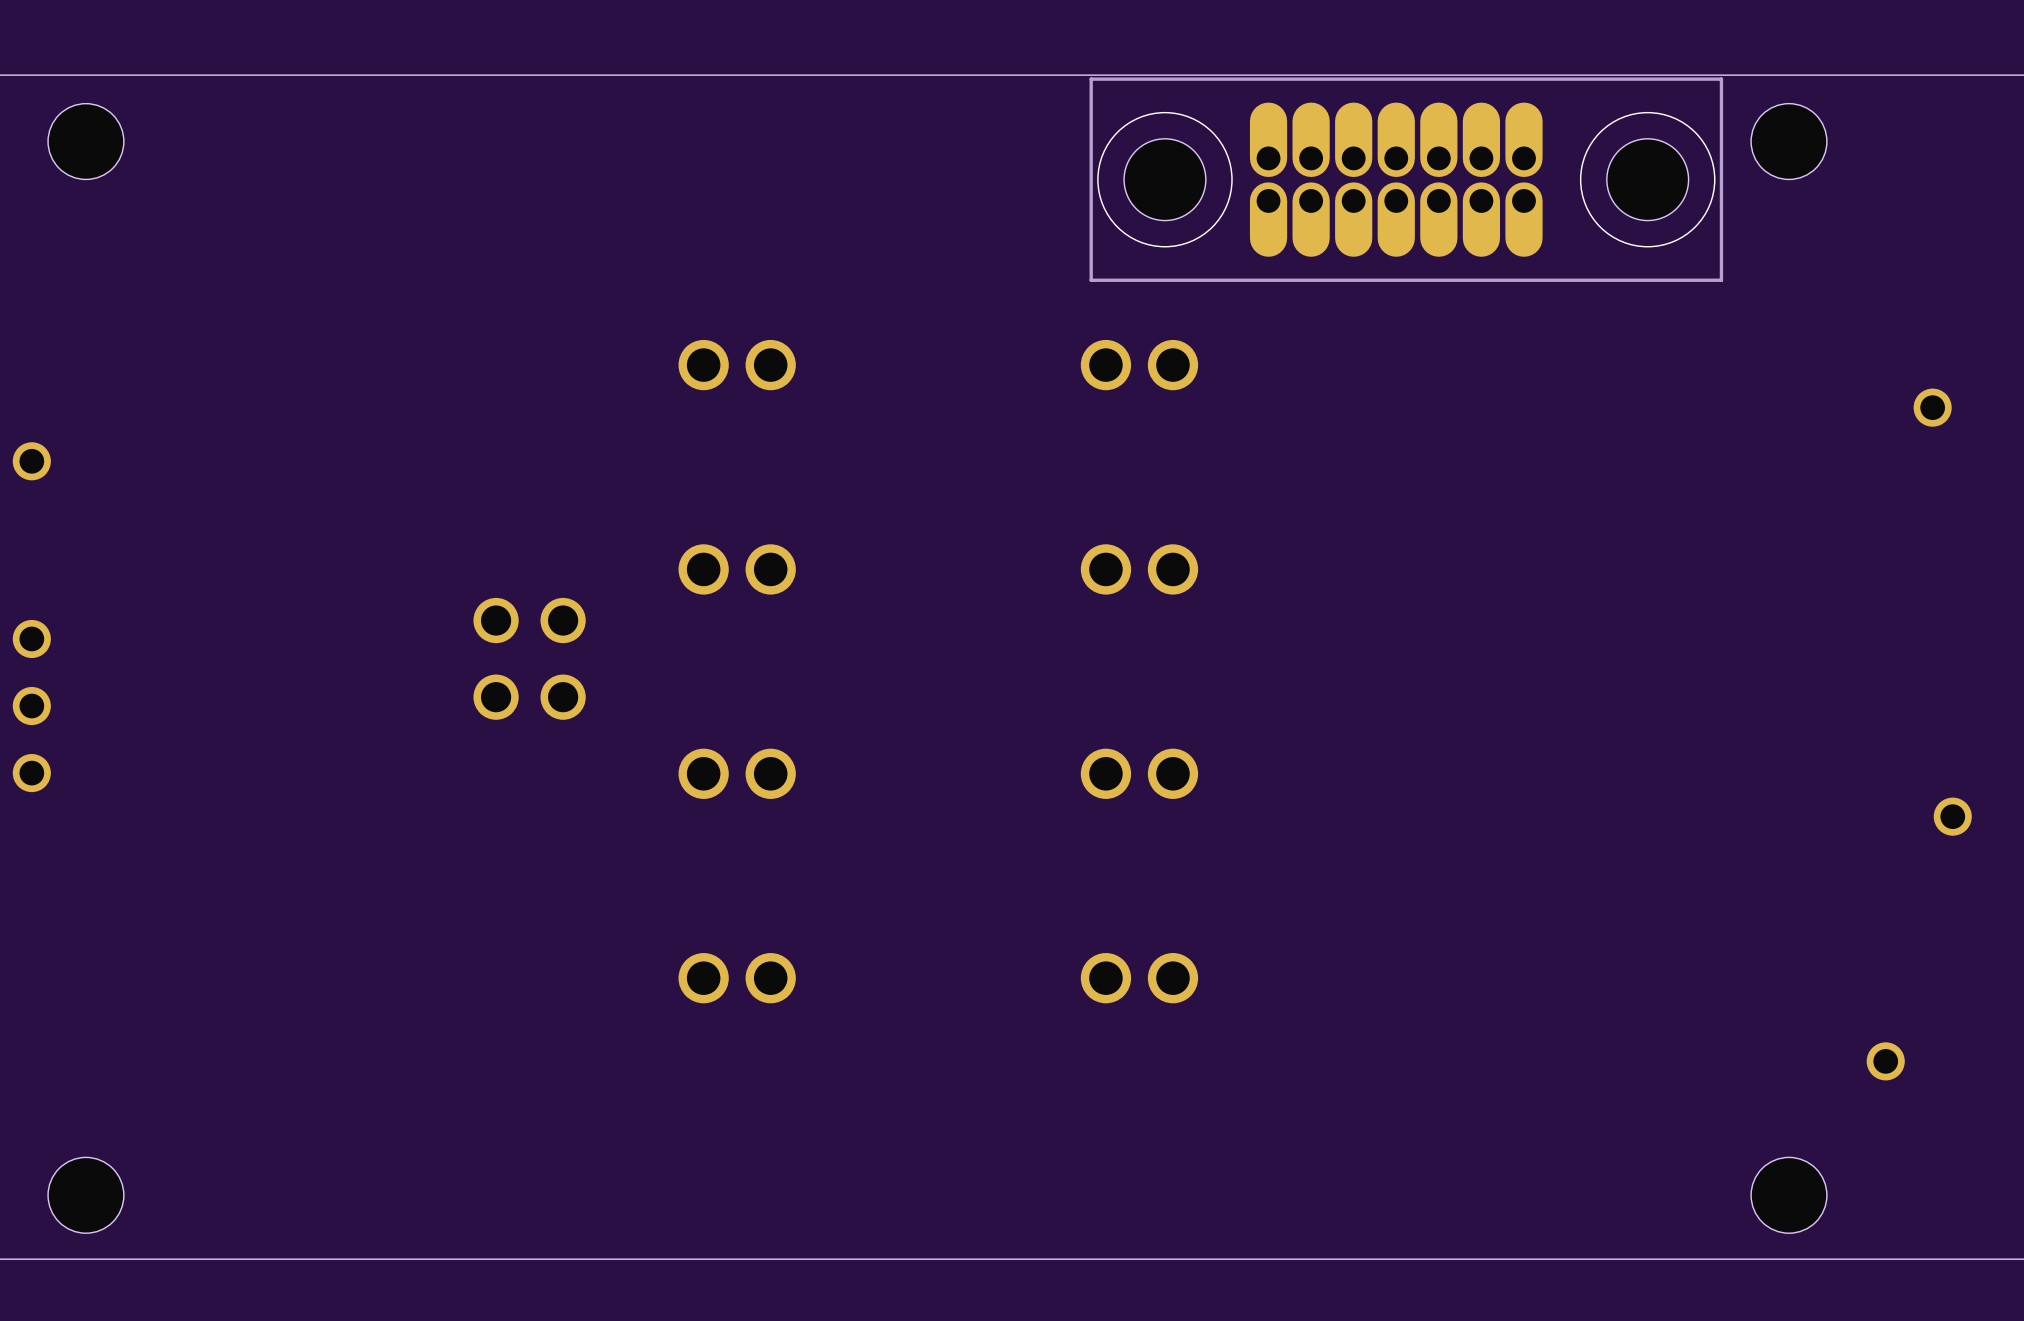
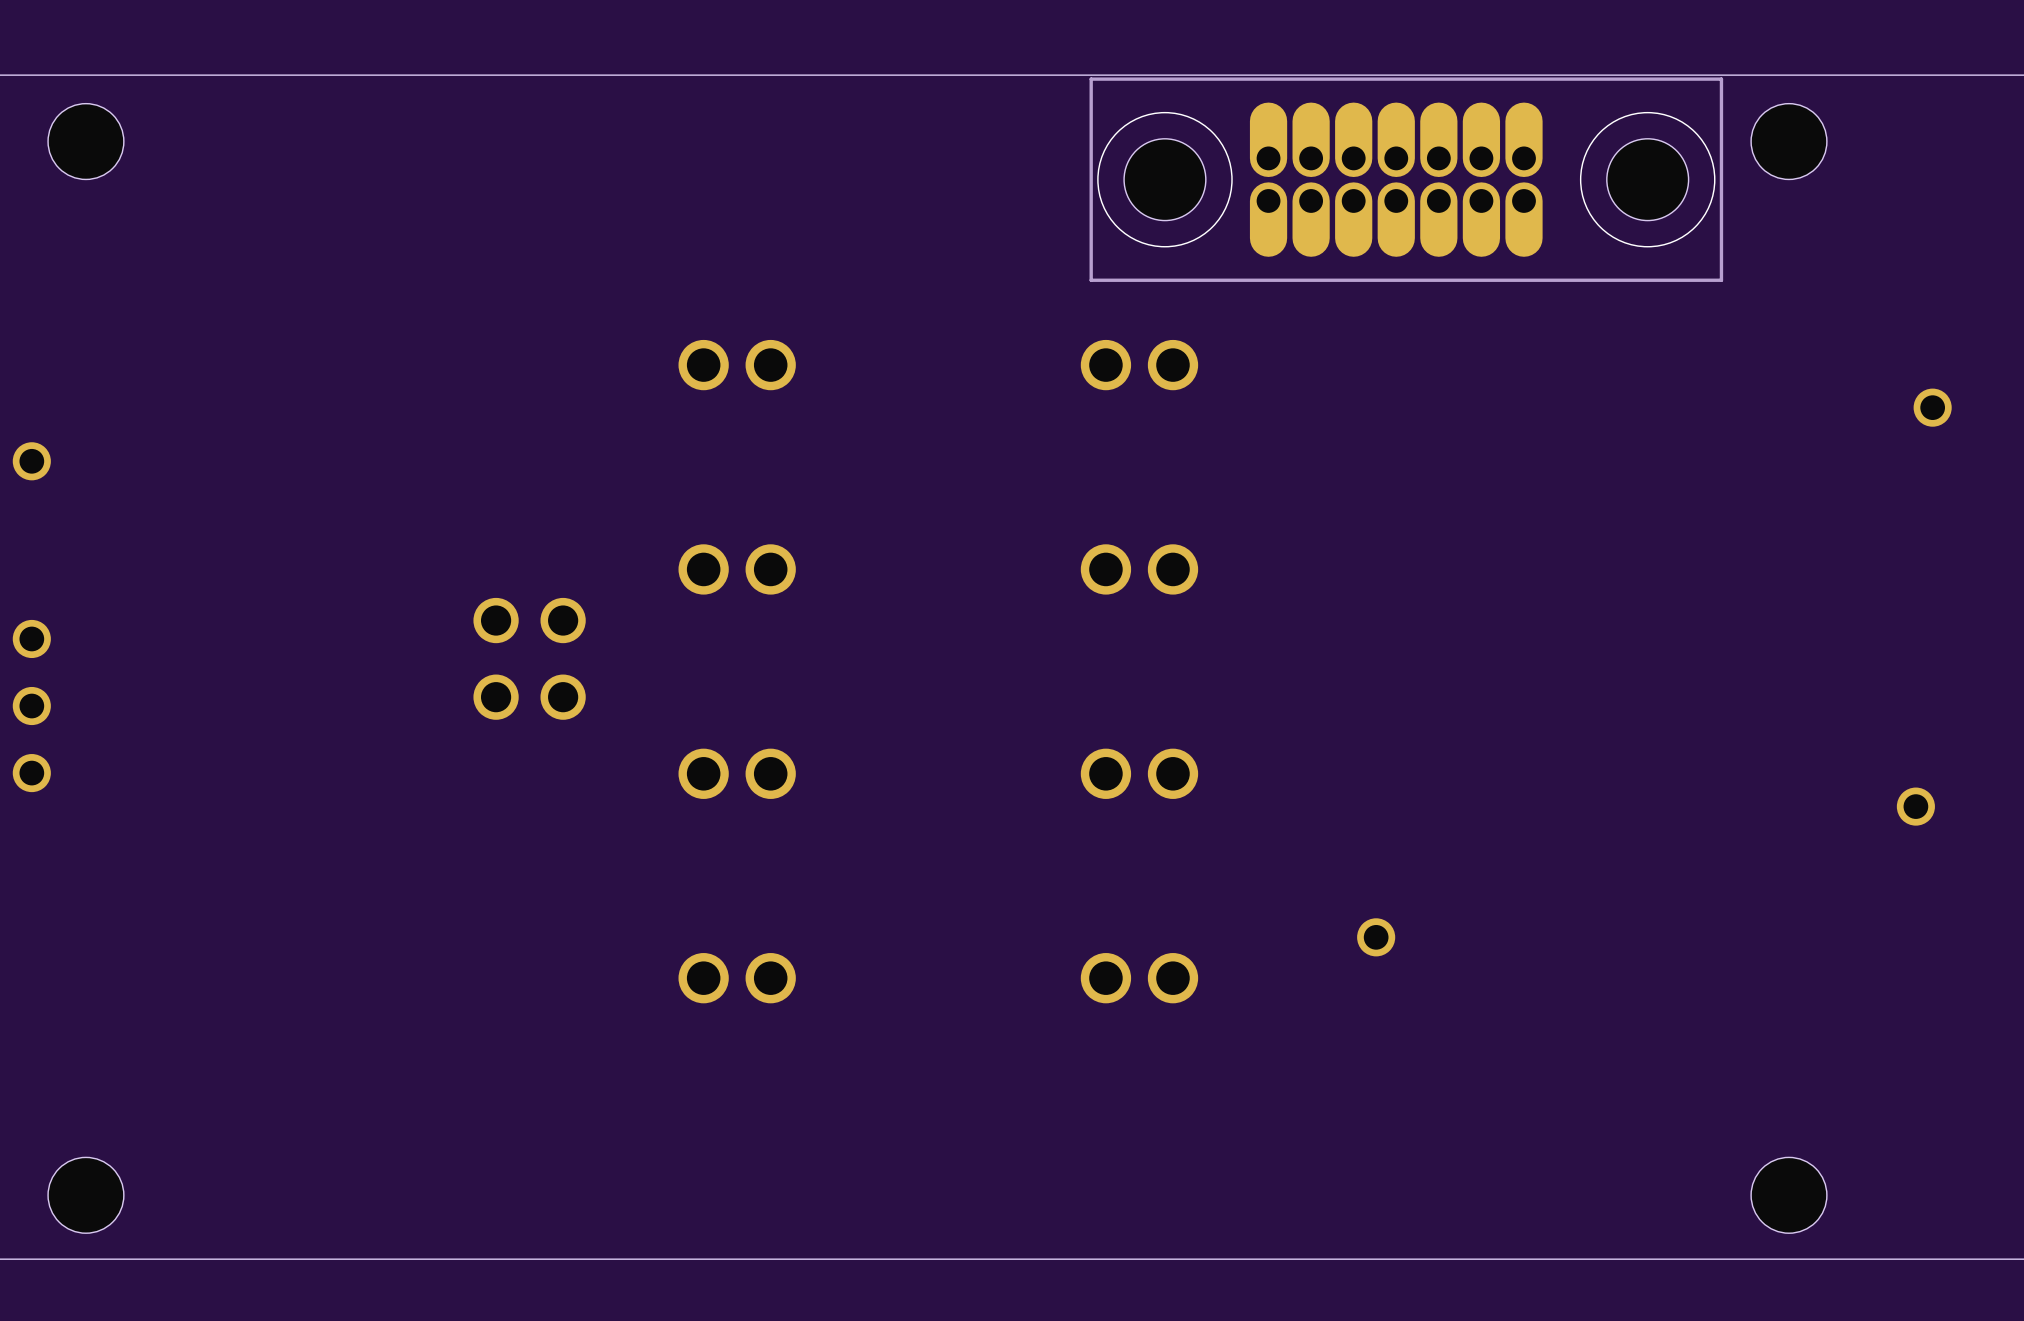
part position: (1952, 816) -> (1915, 806)
part: none -> (1376, 937)
part: (1885, 1061) -> none

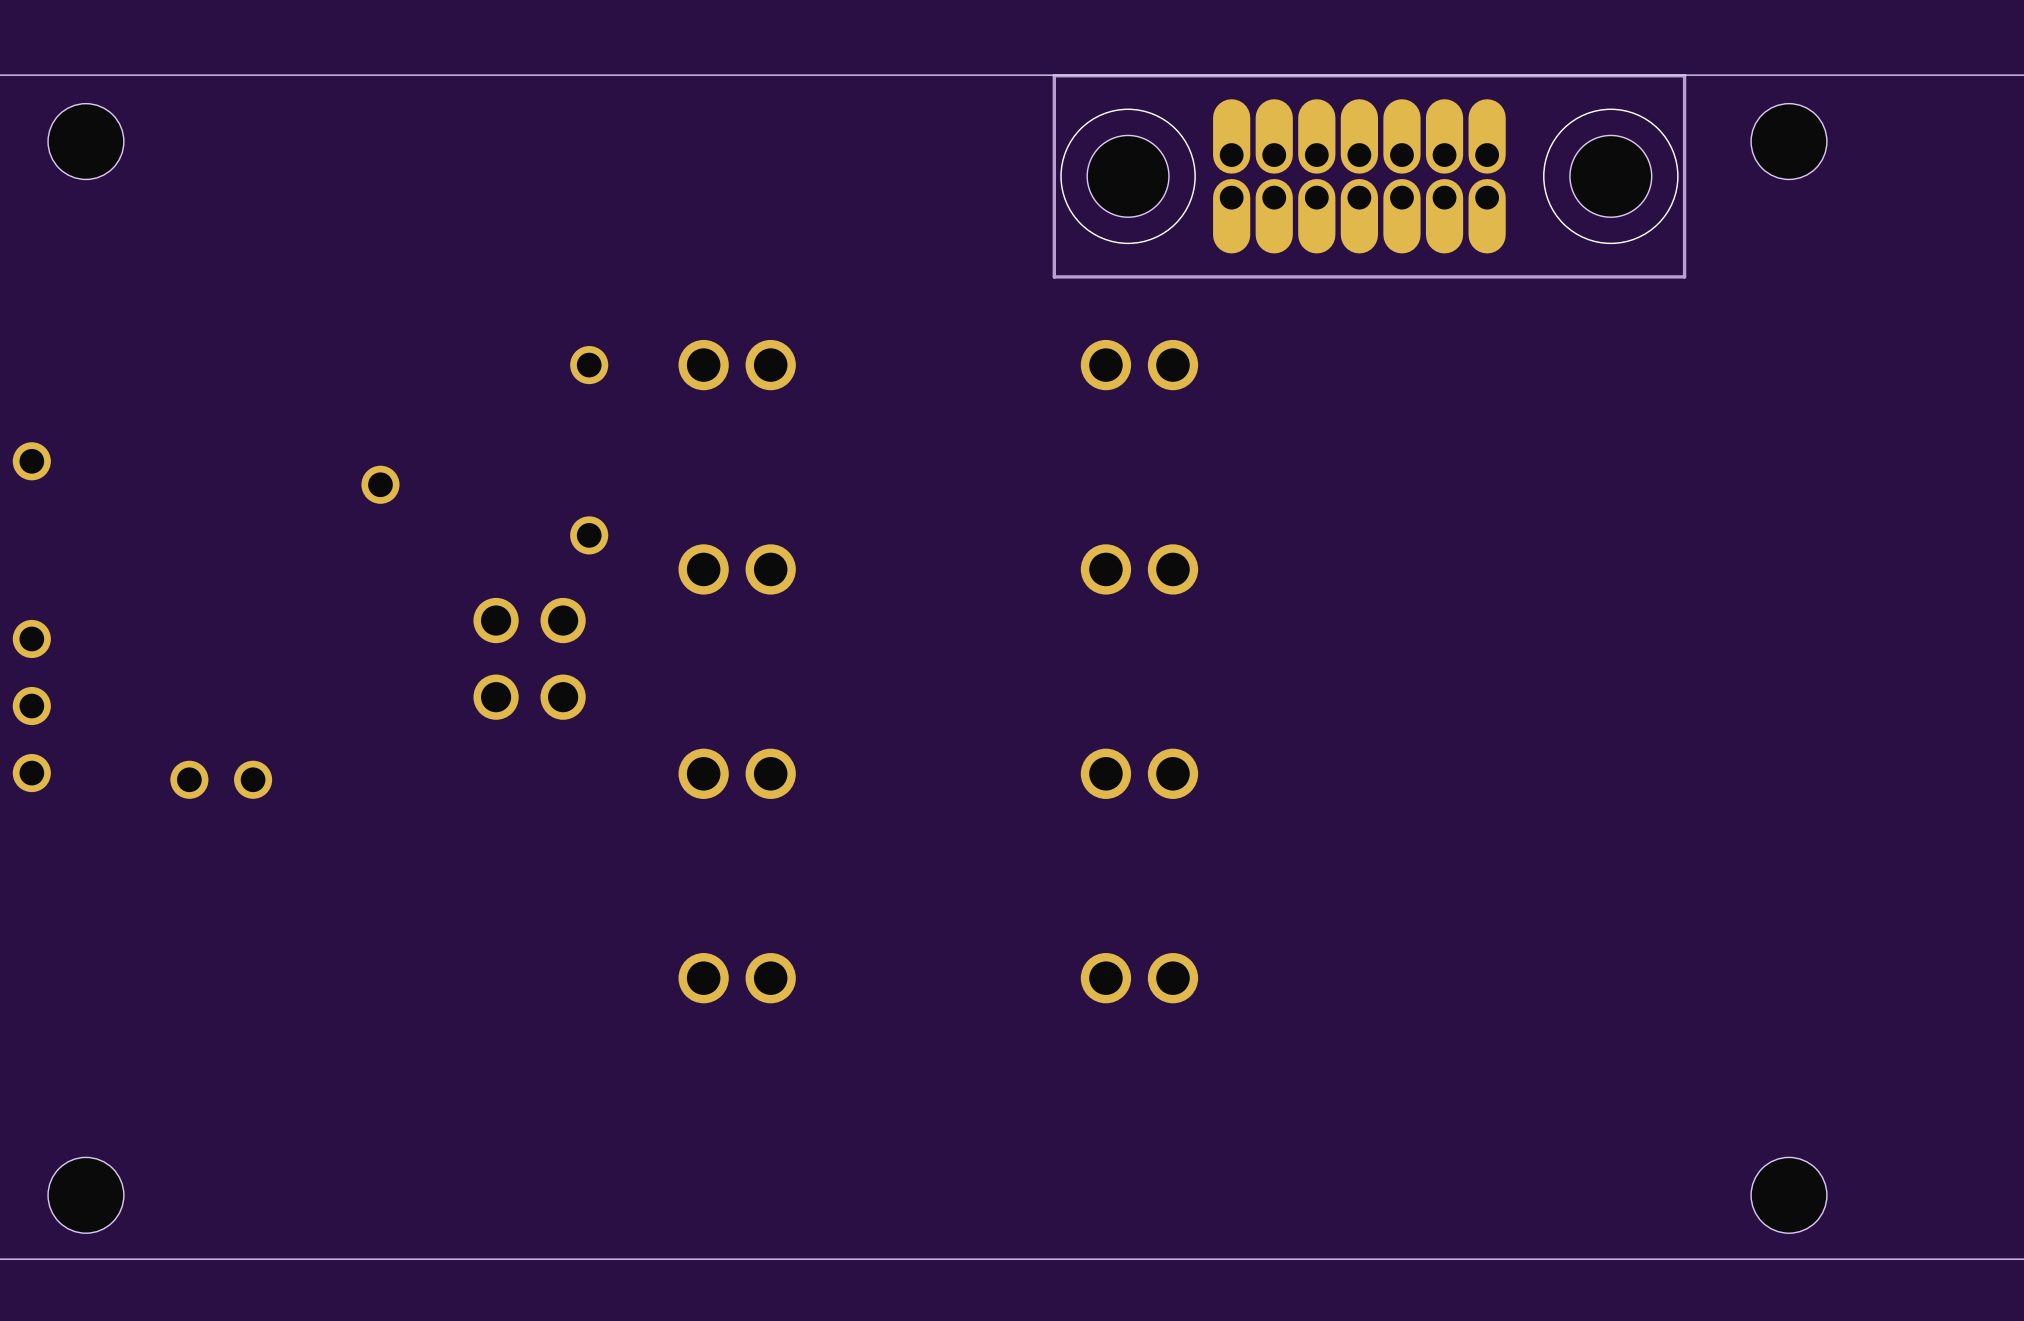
part position: (1406, 179) -> (1369, 176)
part: none -> (589, 365)
part: (1932, 407) -> none
part: none -> (380, 484)
part: none -> (589, 535)
part: none -> (189, 779)
part: none -> (253, 779)
part: (1915, 806) -> none
part: (1376, 937) -> none

